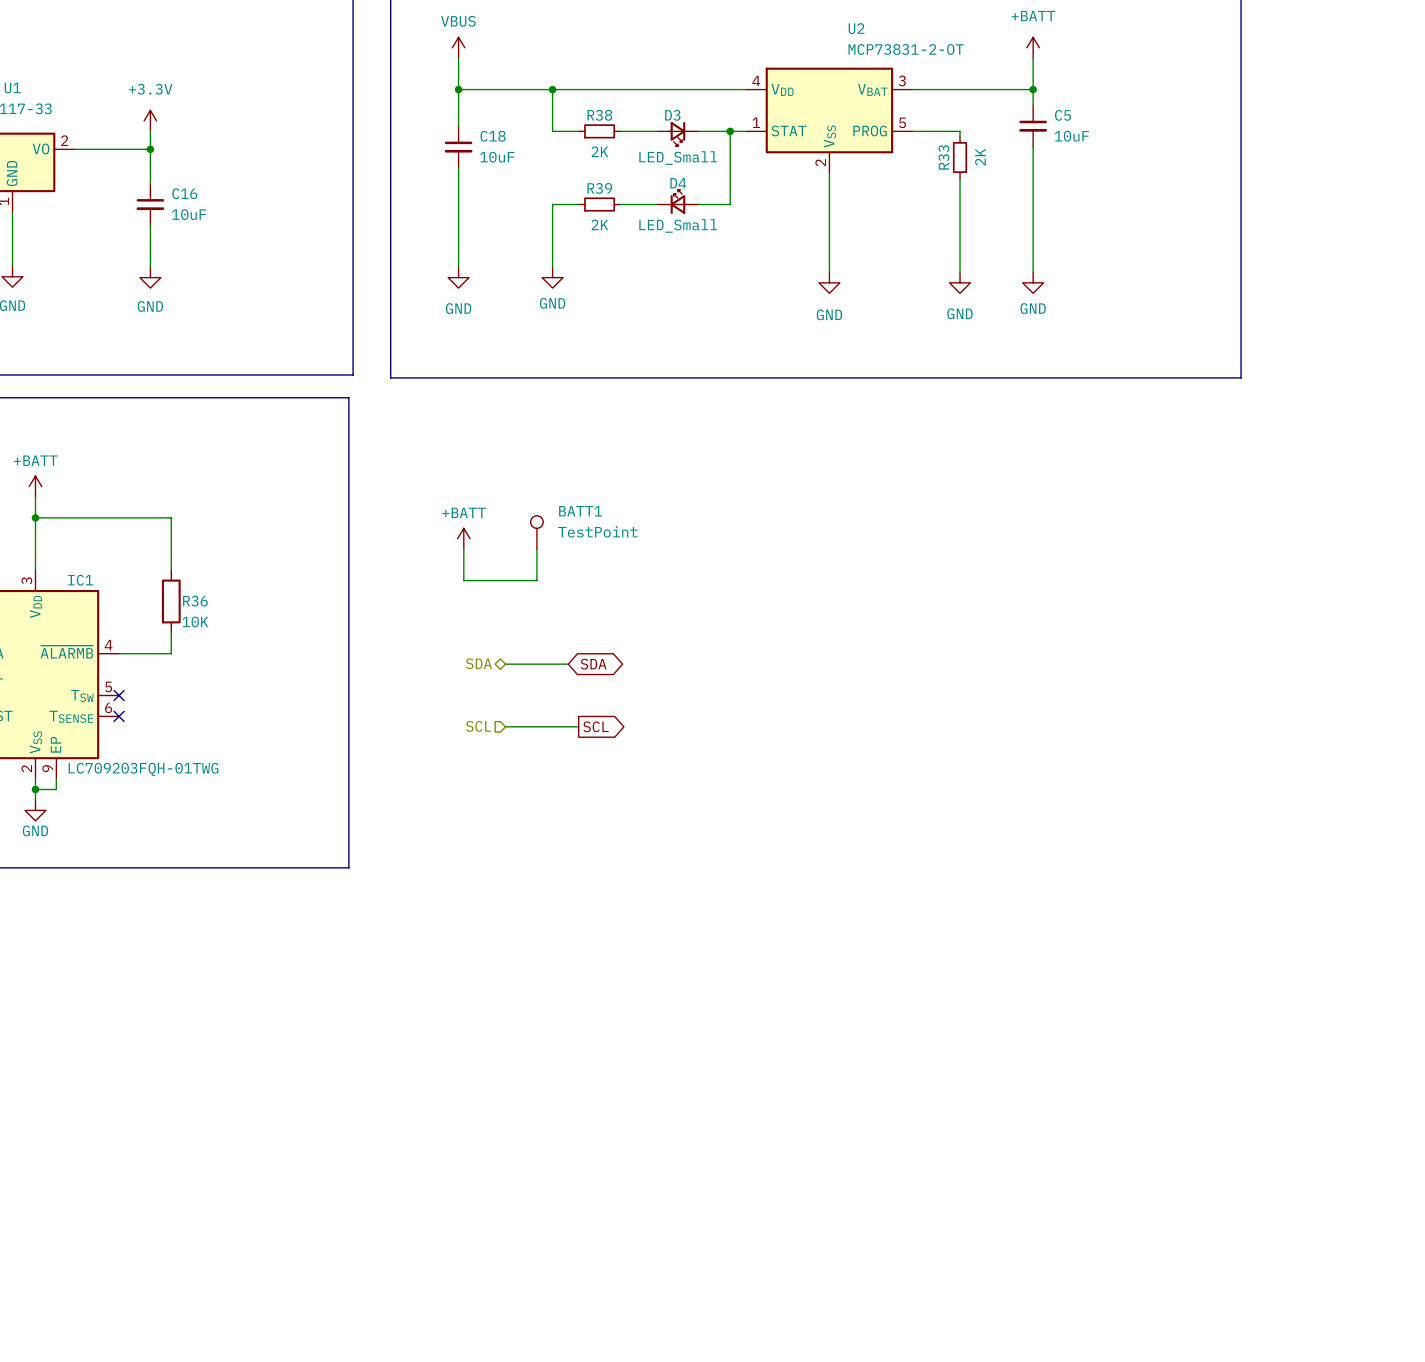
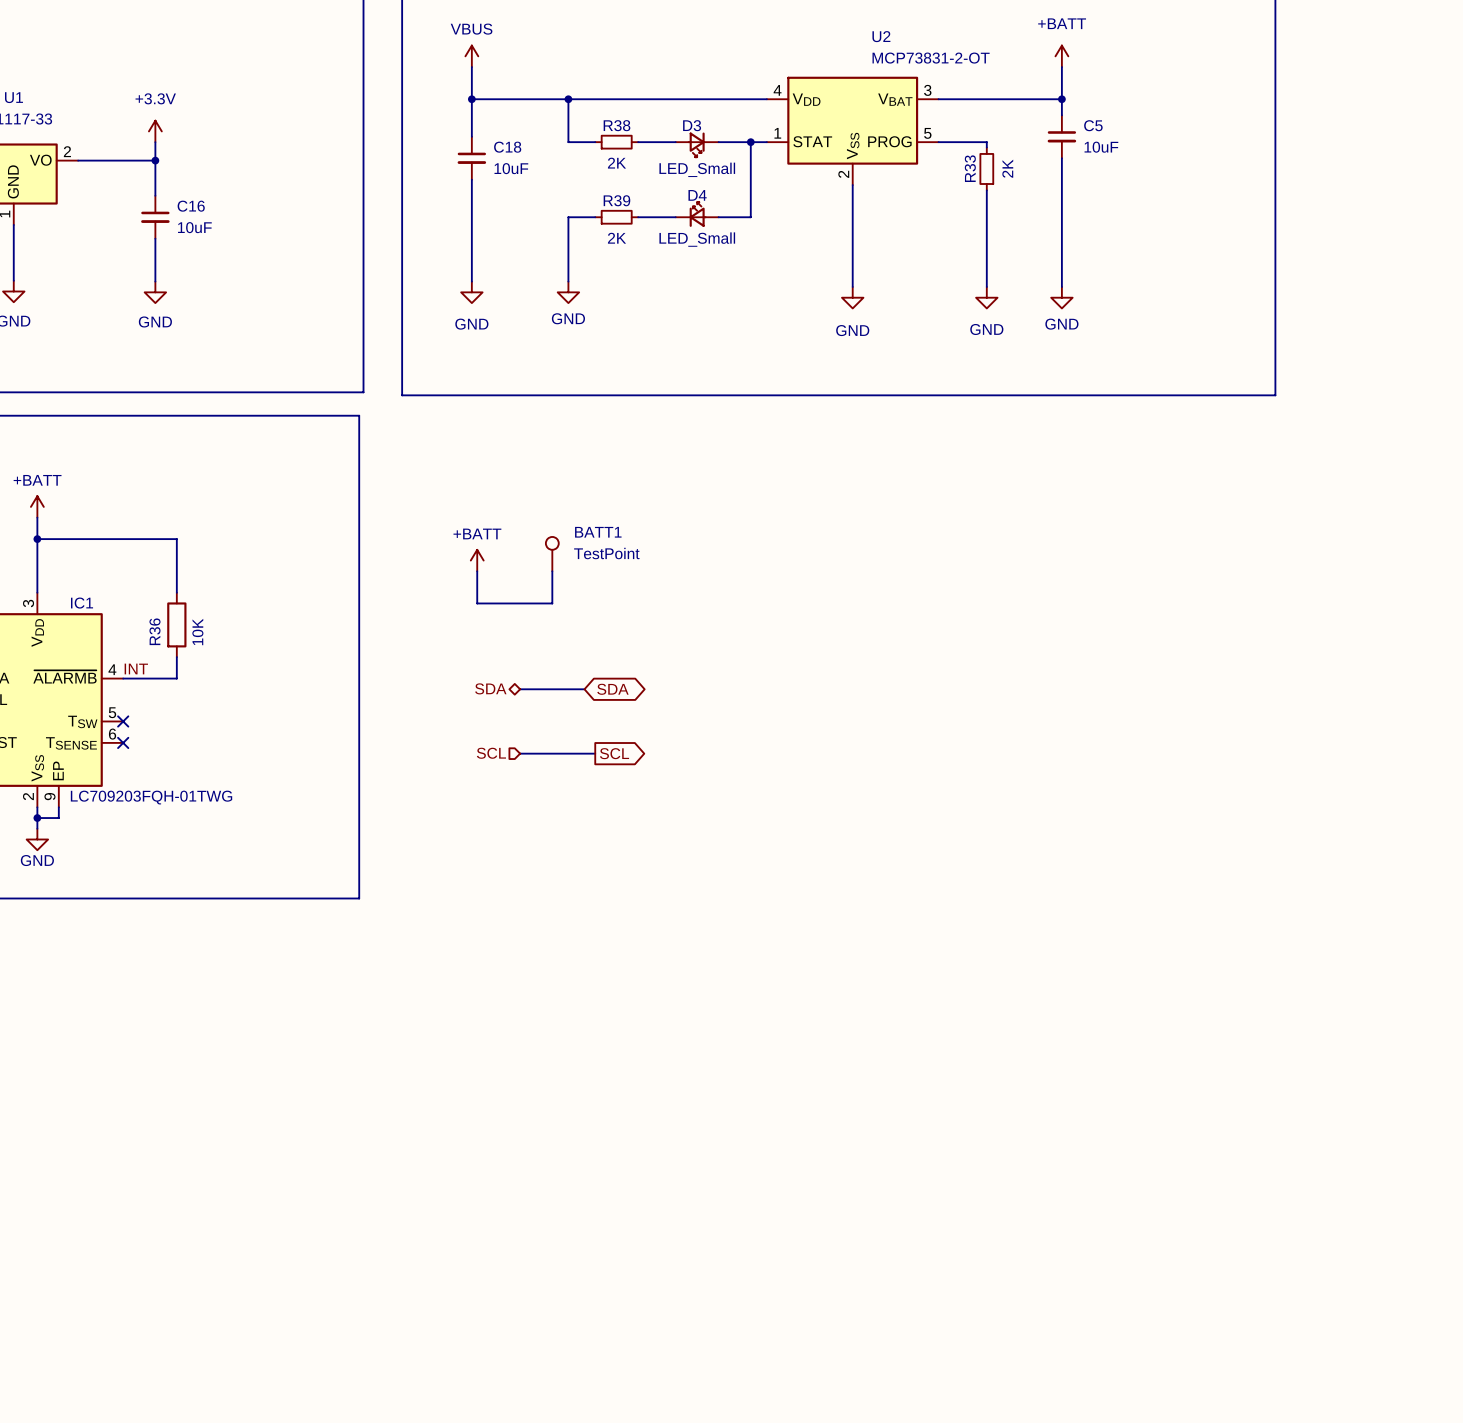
R36 name rotation: 0° (195, 601) -> 90° counterclockwise (154, 631)
R36 name position: R36 (195, 601) -> R36 (154, 631)
R36 value rotation: 0° (195, 621) -> 90° counterclockwise (197, 632)
label: none -> INT (136, 668)

